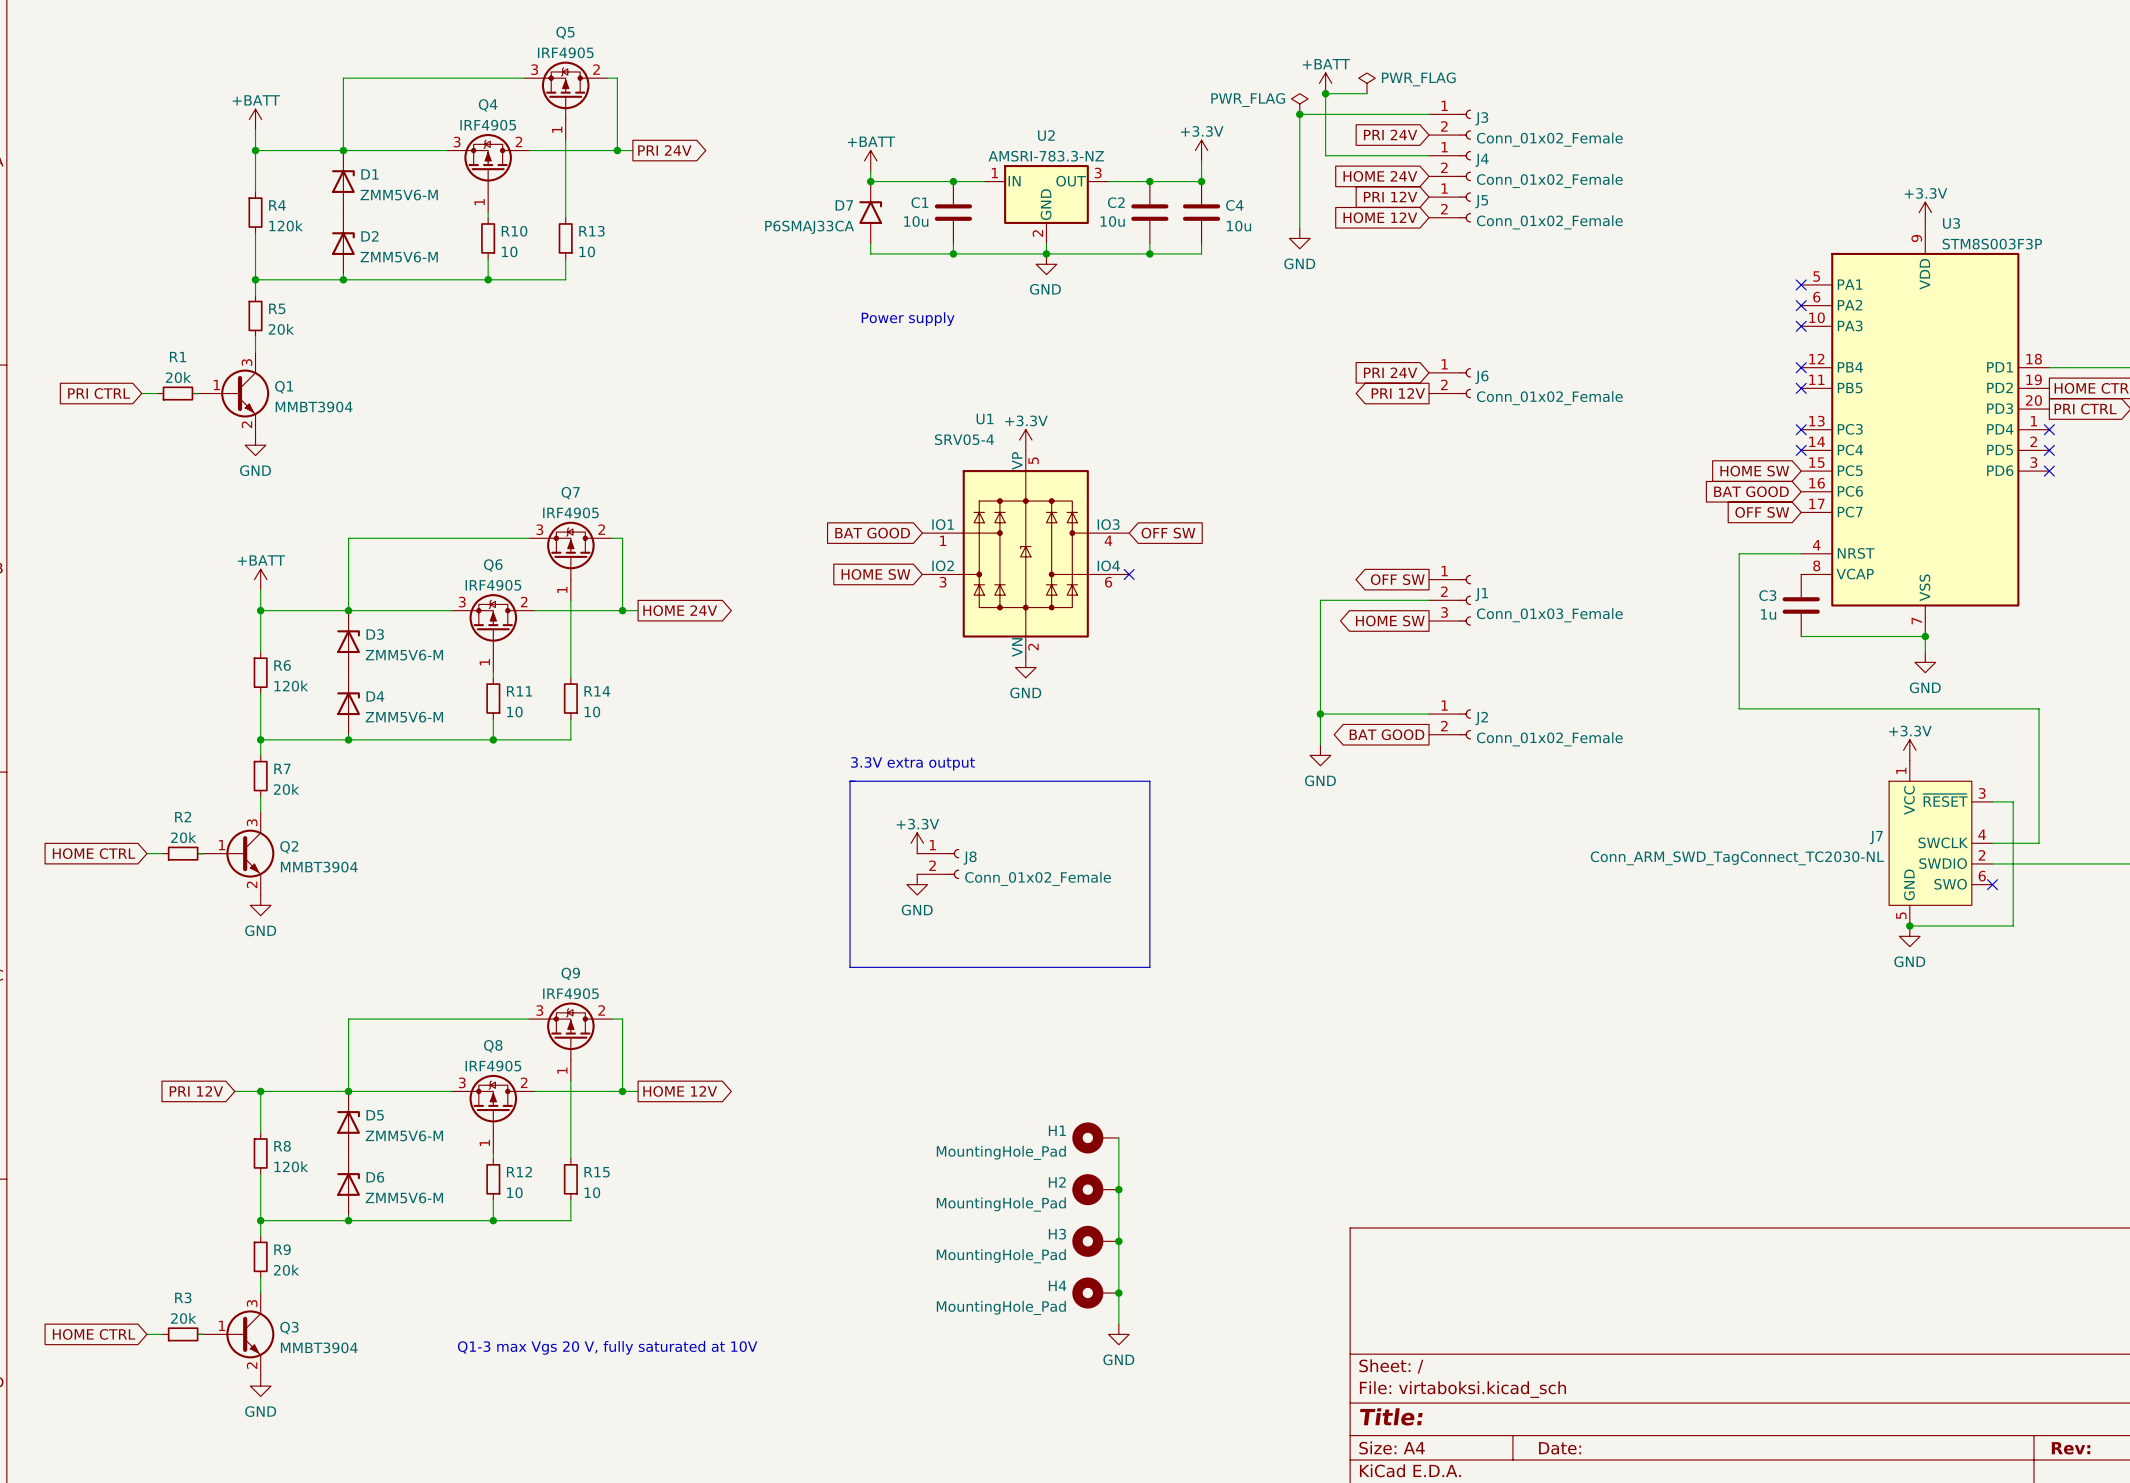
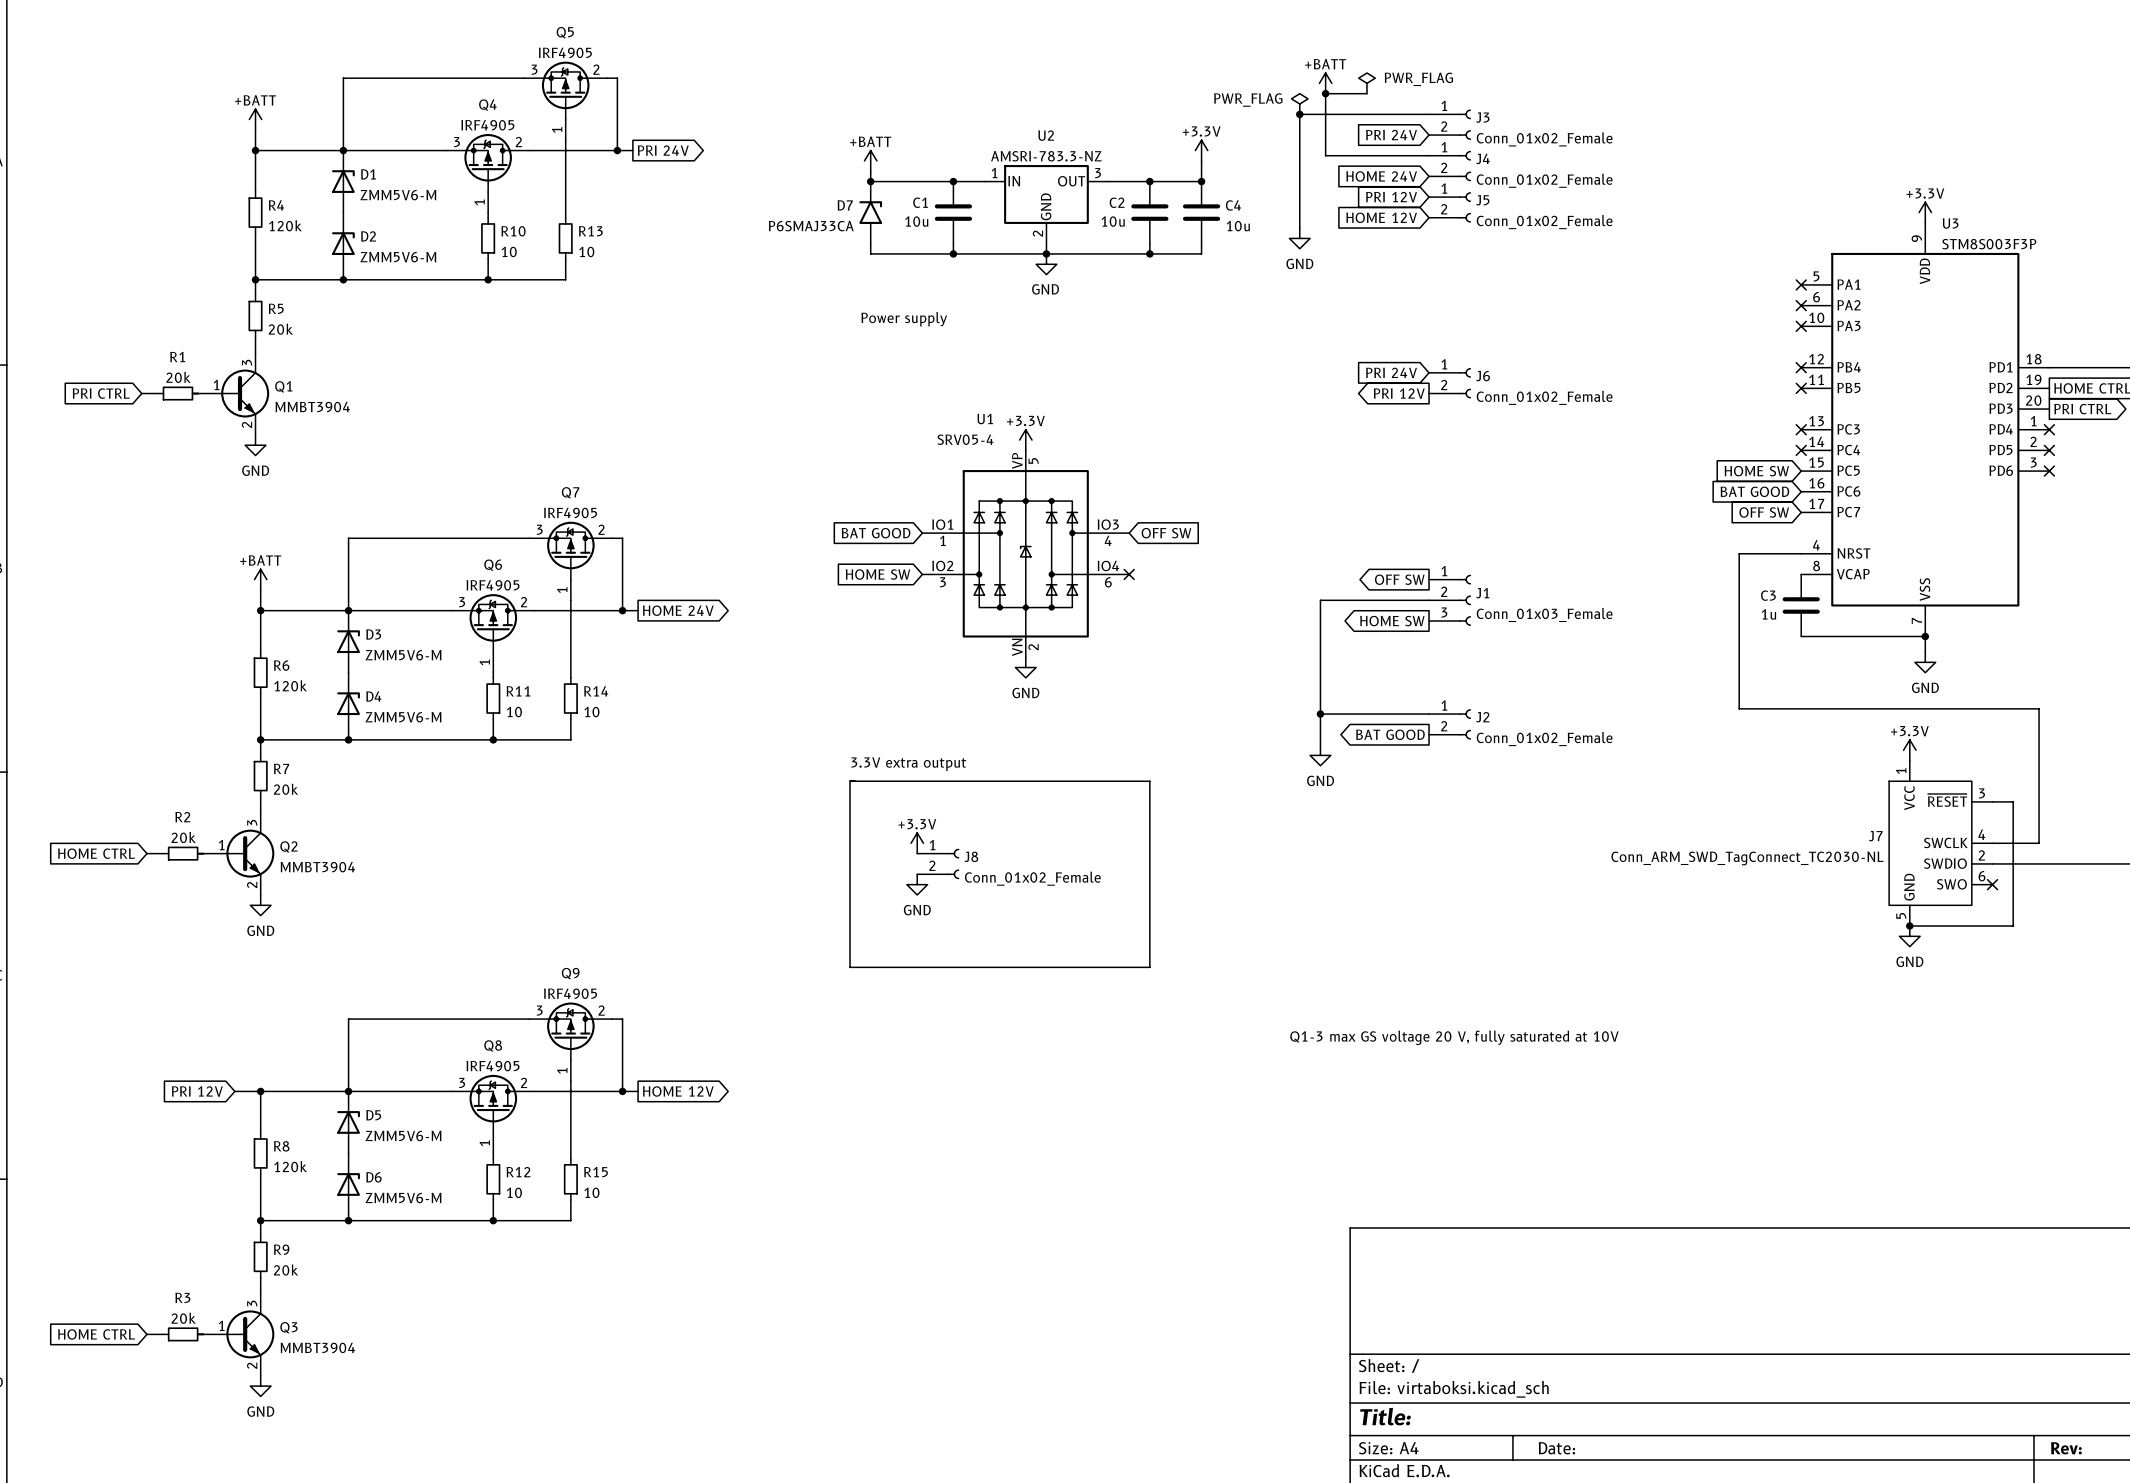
text: none -> Q1-3 max GS voltage 20 V, fully saturated at 10V (1454, 1037)
H1: MountingHole_Pad (1095, 1137) -> none
wire: (1118, 1137) (1118, 1324) -> none
H2: MountingHole_Pad (1095, 1189) -> none
junction: (1118, 1189) -> none
H3: MountingHole_Pad (1095, 1241) -> none
junction: (1118, 1241) -> none
H4: MountingHole_Pad (1095, 1293) -> none
junction: (1118, 1293) -> none
power symbol: GND (1118, 1334) -> none
text: Q1-3 max Vgs 20 V, fully saturated at 10V (607, 1347) -> none

